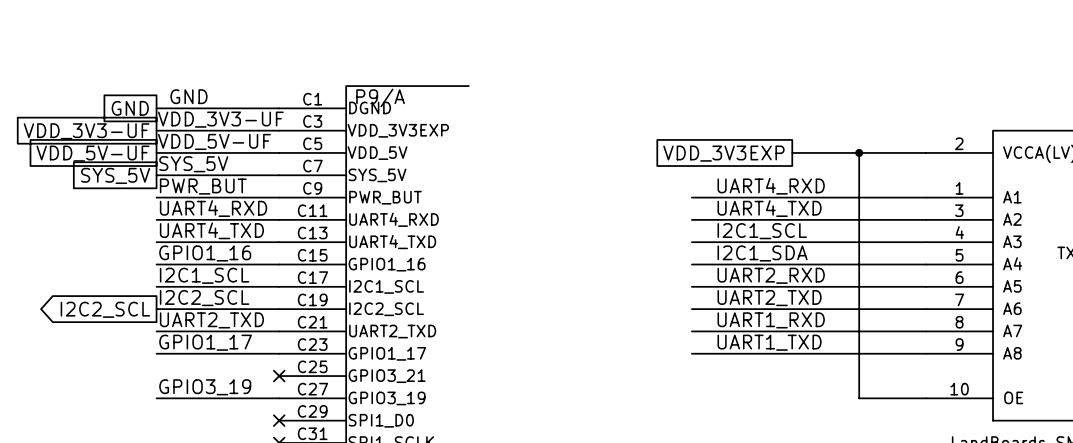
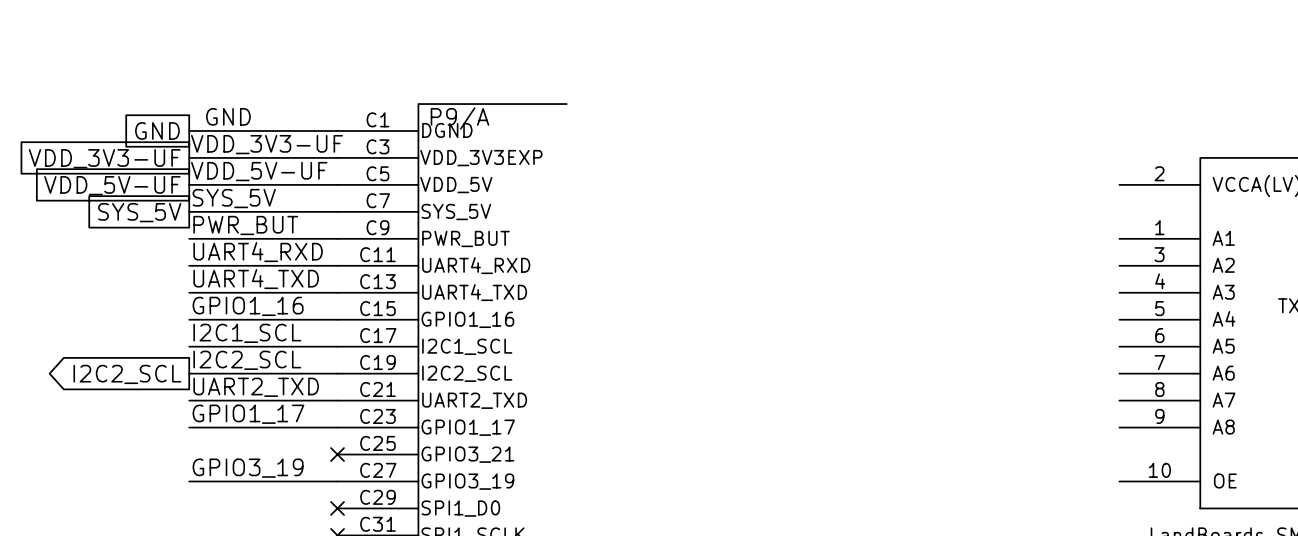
wire: (792, 152) (926, 152) -> none
wire: (859, 152) (859, 398) (926, 398) -> none
junction: (859, 152) -> none
global label: VDD_3V3EXP (723, 153) -> none
label: UART4_RXD (771, 186) -> none
wire: (691, 197) (926, 197) -> none
label: UART4_TXD (769, 208) -> none
wire: (691, 219) (926, 219) -> none
label: I2C1_SCL (762, 231) -> none
wire: (691, 242) (926, 242) -> none
label: I2C1_SDA (762, 253) -> none
wire: (691, 264) (926, 264) -> none
label: UART2_RXD (771, 275) -> none
wire: (691, 286) (926, 286) -> none
label: UART2_TXD (769, 298) -> none
wire: (691, 309) (926, 309) -> none
label: UART1_RXD (771, 320) -> none
wire: (691, 331) (926, 331) -> none
label: UART1_TXD (769, 342) -> none
wire: (691, 353) (926, 353) -> none

